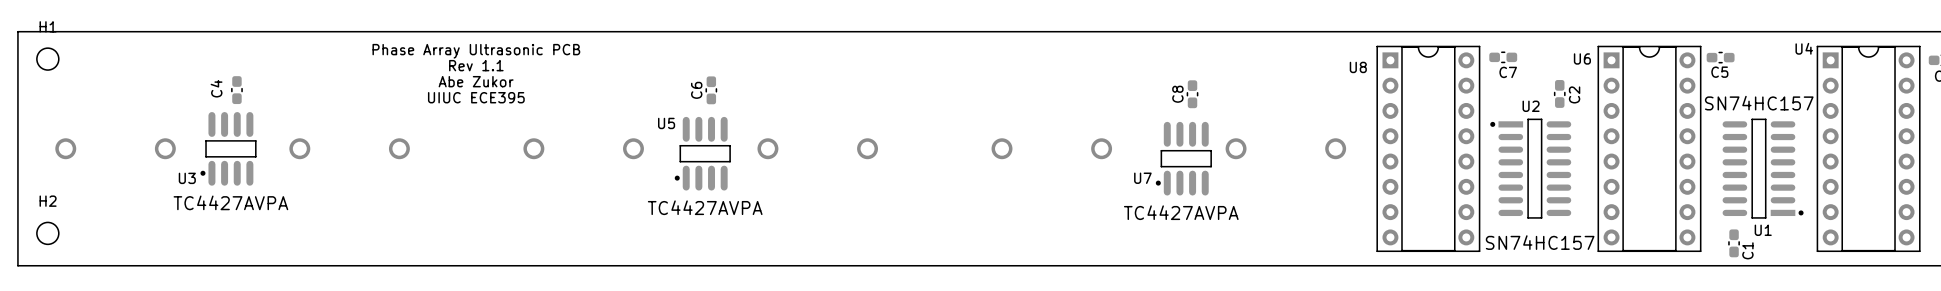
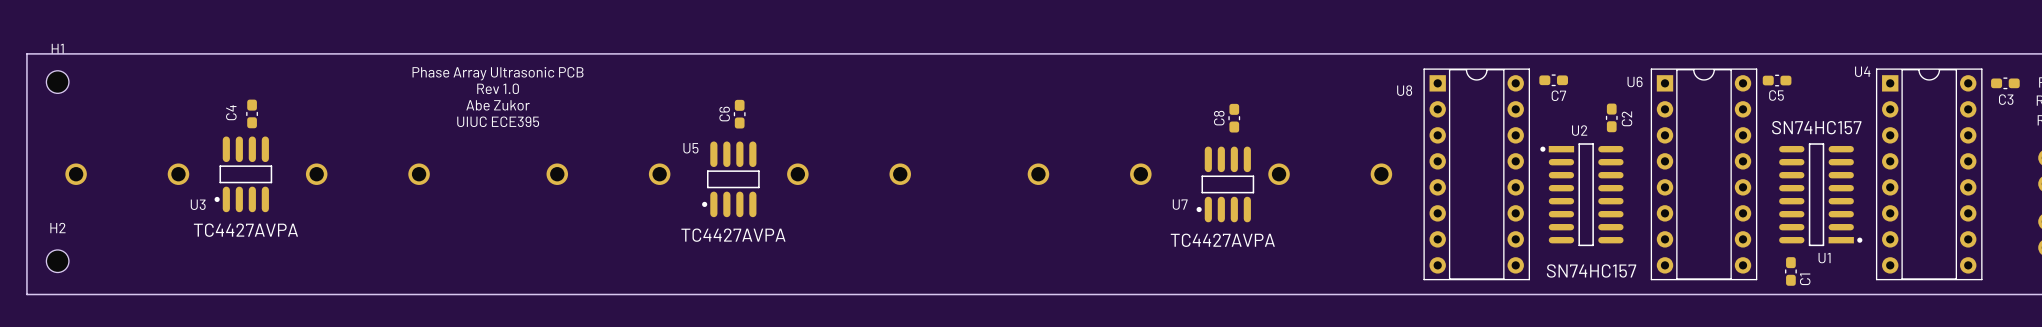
text: Rev 1.1 (476, 65) -> Rev 1.0 (498, 88)

